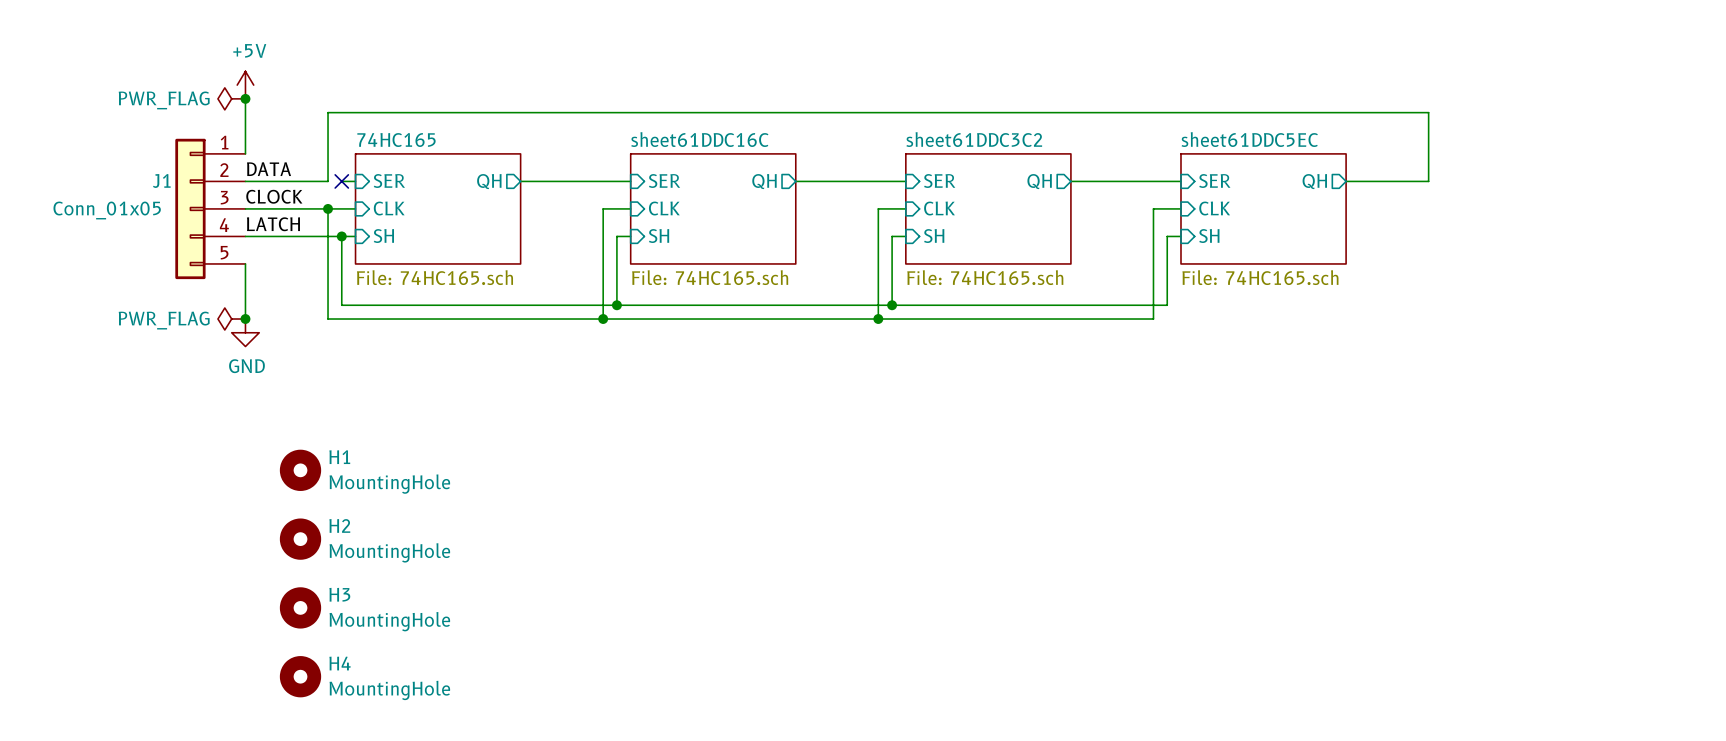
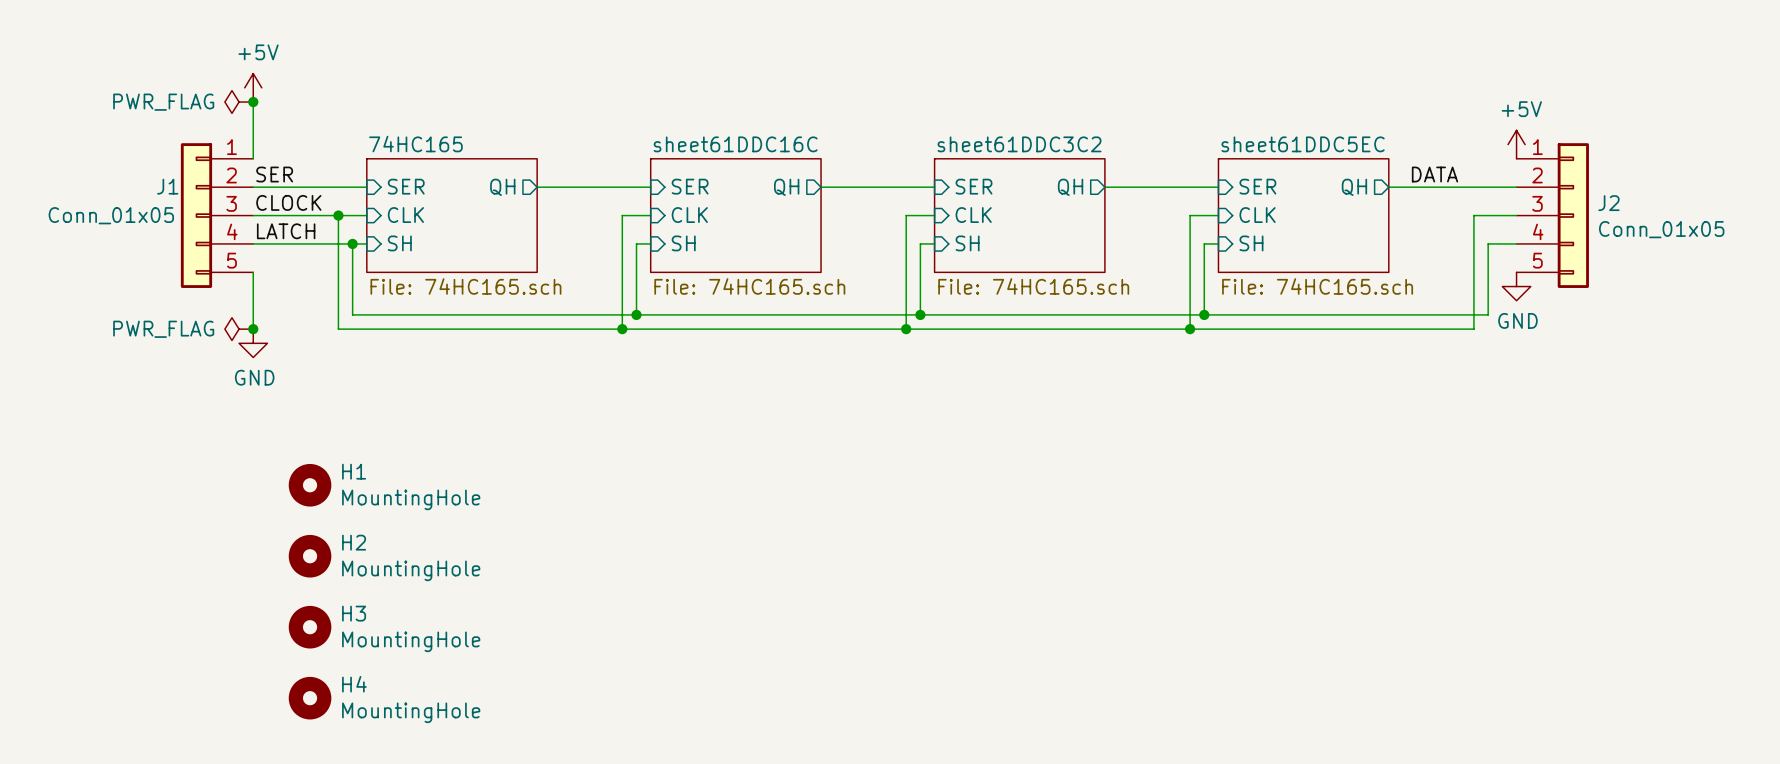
power symbol: none -> +5V (1516, 144)
label: DATA (269, 169) -> SER (274, 174)
label: none -> DATA (1434, 174)
wire: (328, 181) (328, 112) (1428, 112) (1428, 181) -> (338, 187) (352, 187)
no-connect mark: (341, 181) -> none
wire: none -> (1473, 187) (1516, 187)
wire: none -> (1516, 215) (1473, 215) (1473, 329) (1190, 329)
J2: none -> Conn_01x05 (1552, 215)
wire: none -> (1516, 243) (1488, 243) (1488, 314) (1204, 314)
power symbol: none -> GND (1516, 286)
junction: none -> (1204, 314)
junction: none -> (1190, 329)

